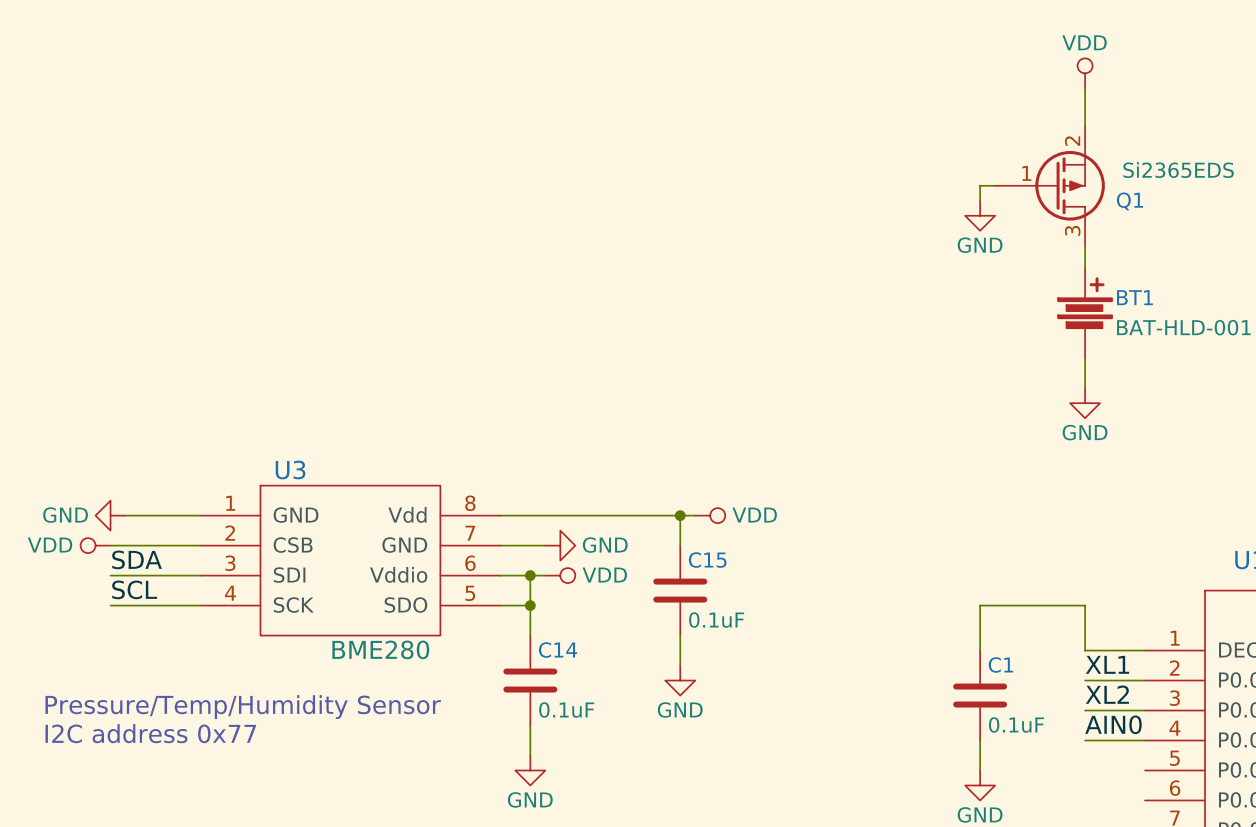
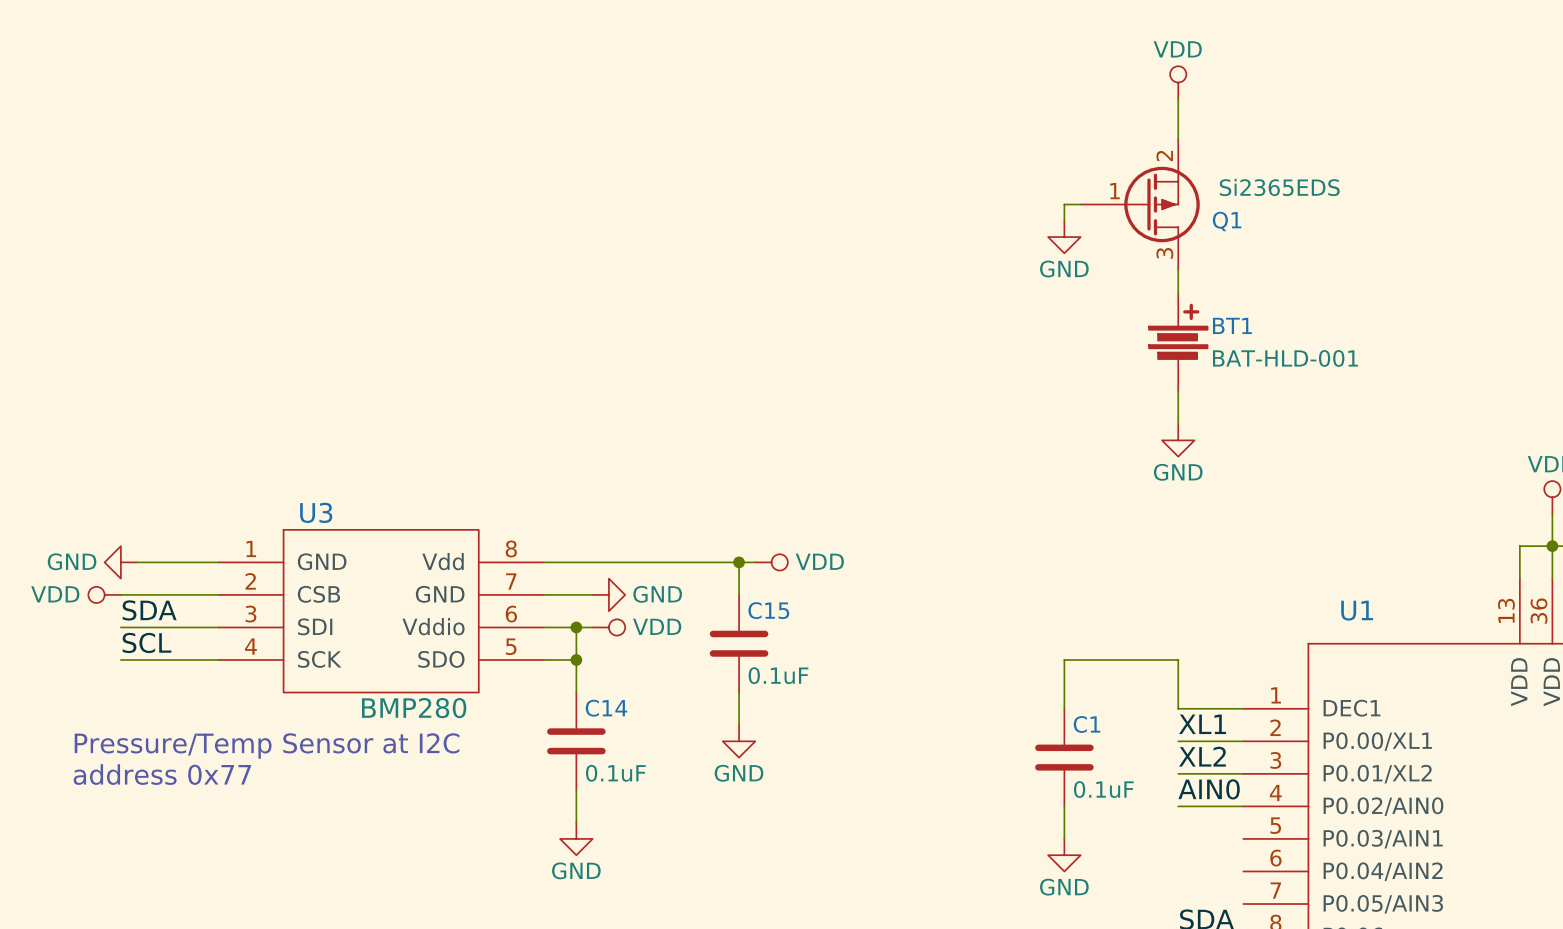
U3 value: BME280 (380, 649) -> BMP280 (414, 708)
text: Pressure/Temp/Humidity Sensor (243, 707) -> Pressure/Temp Sensor at I2C (267, 745)
text: I2C address 0x77 (150, 733) -> address 0x77 (162, 774)

